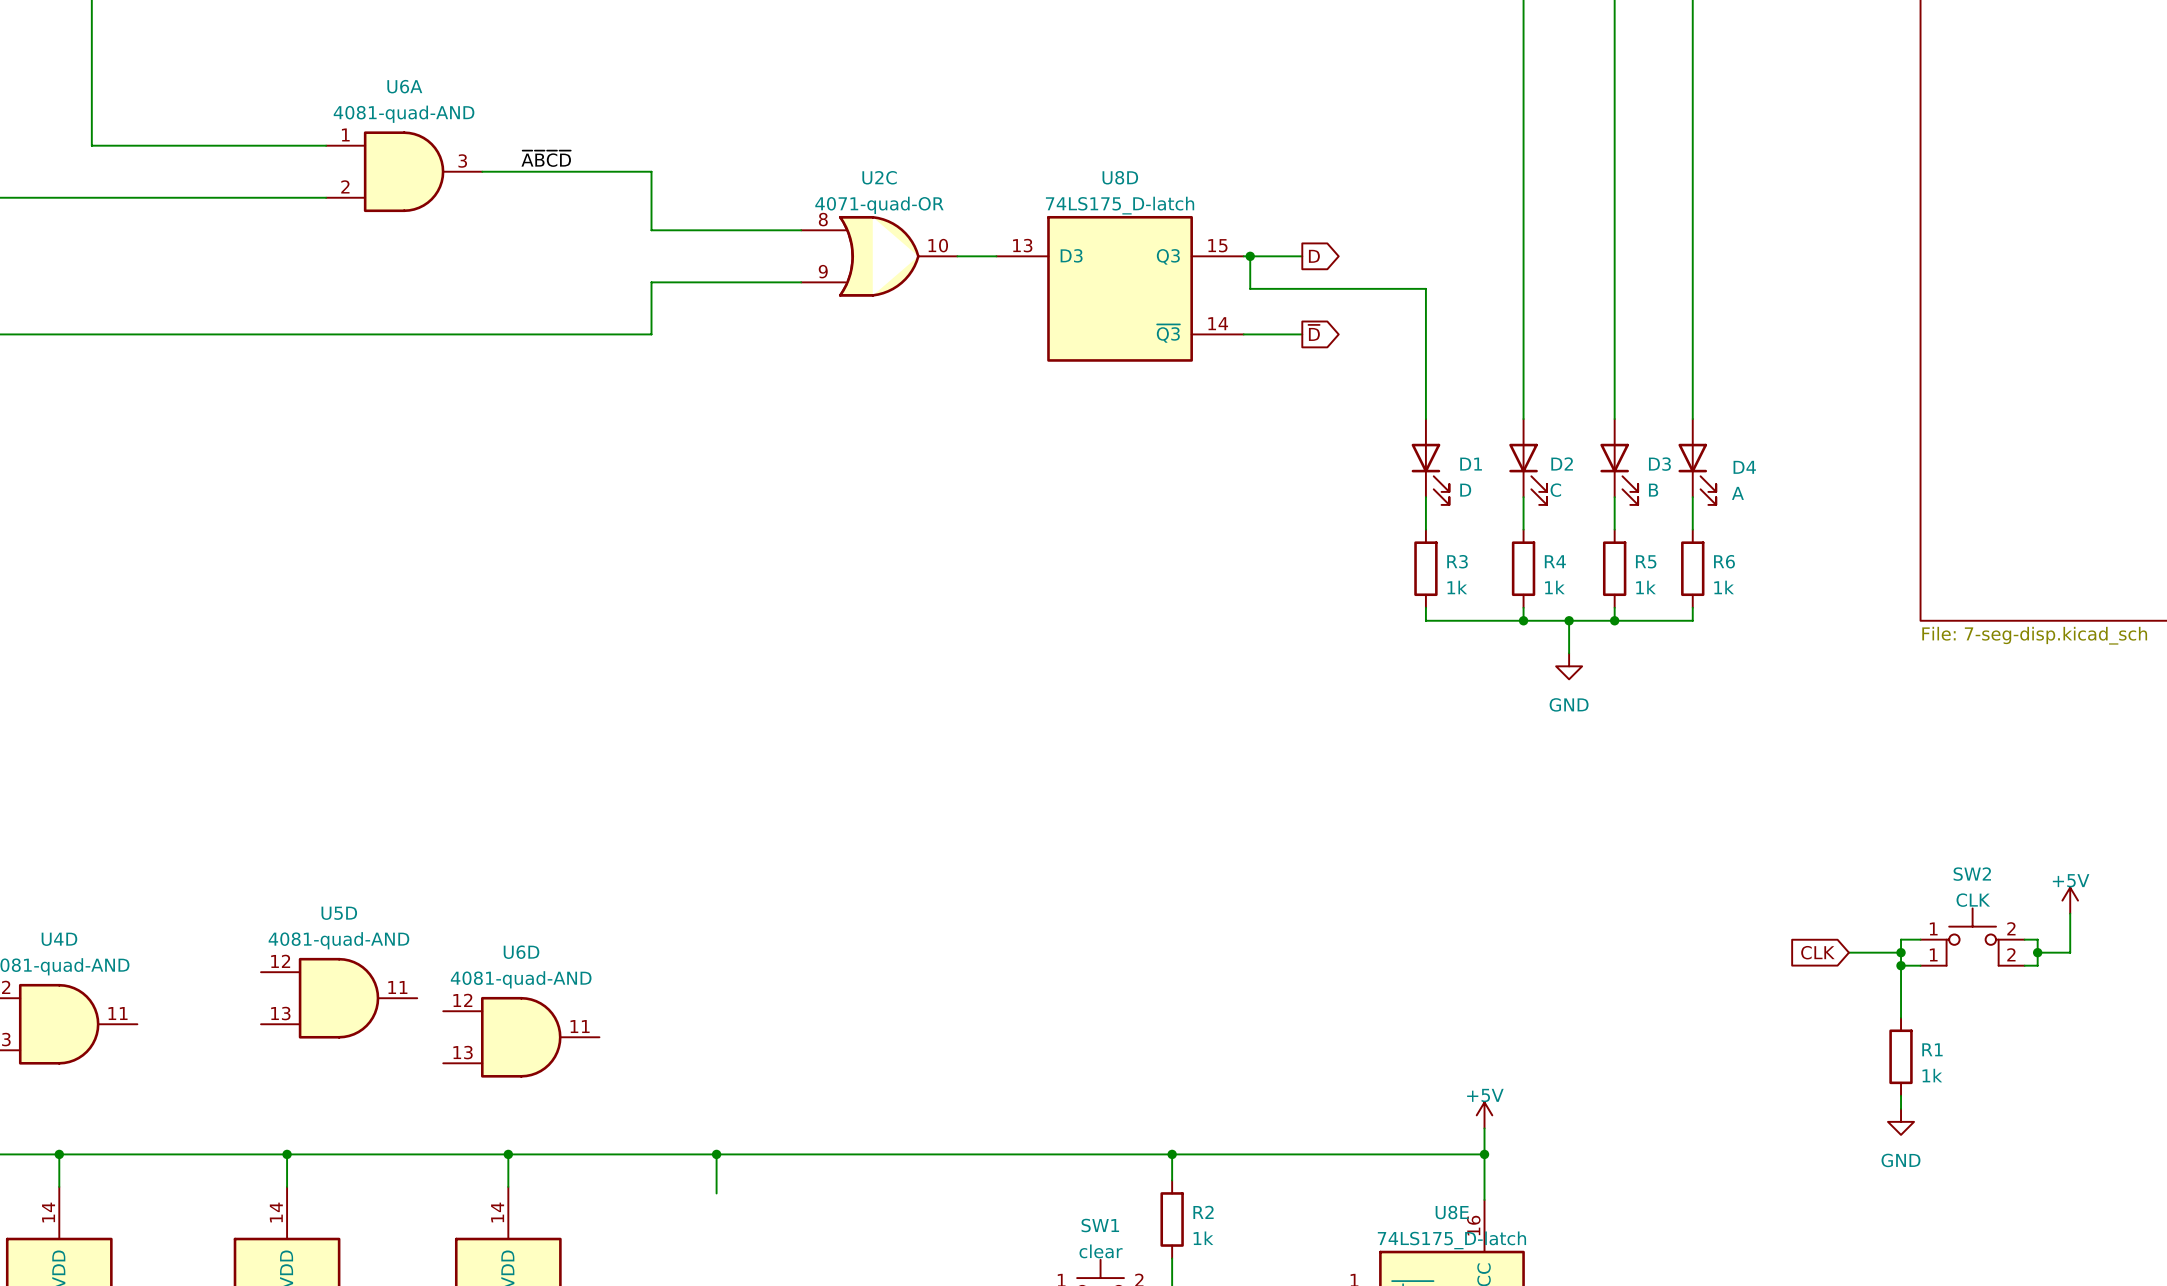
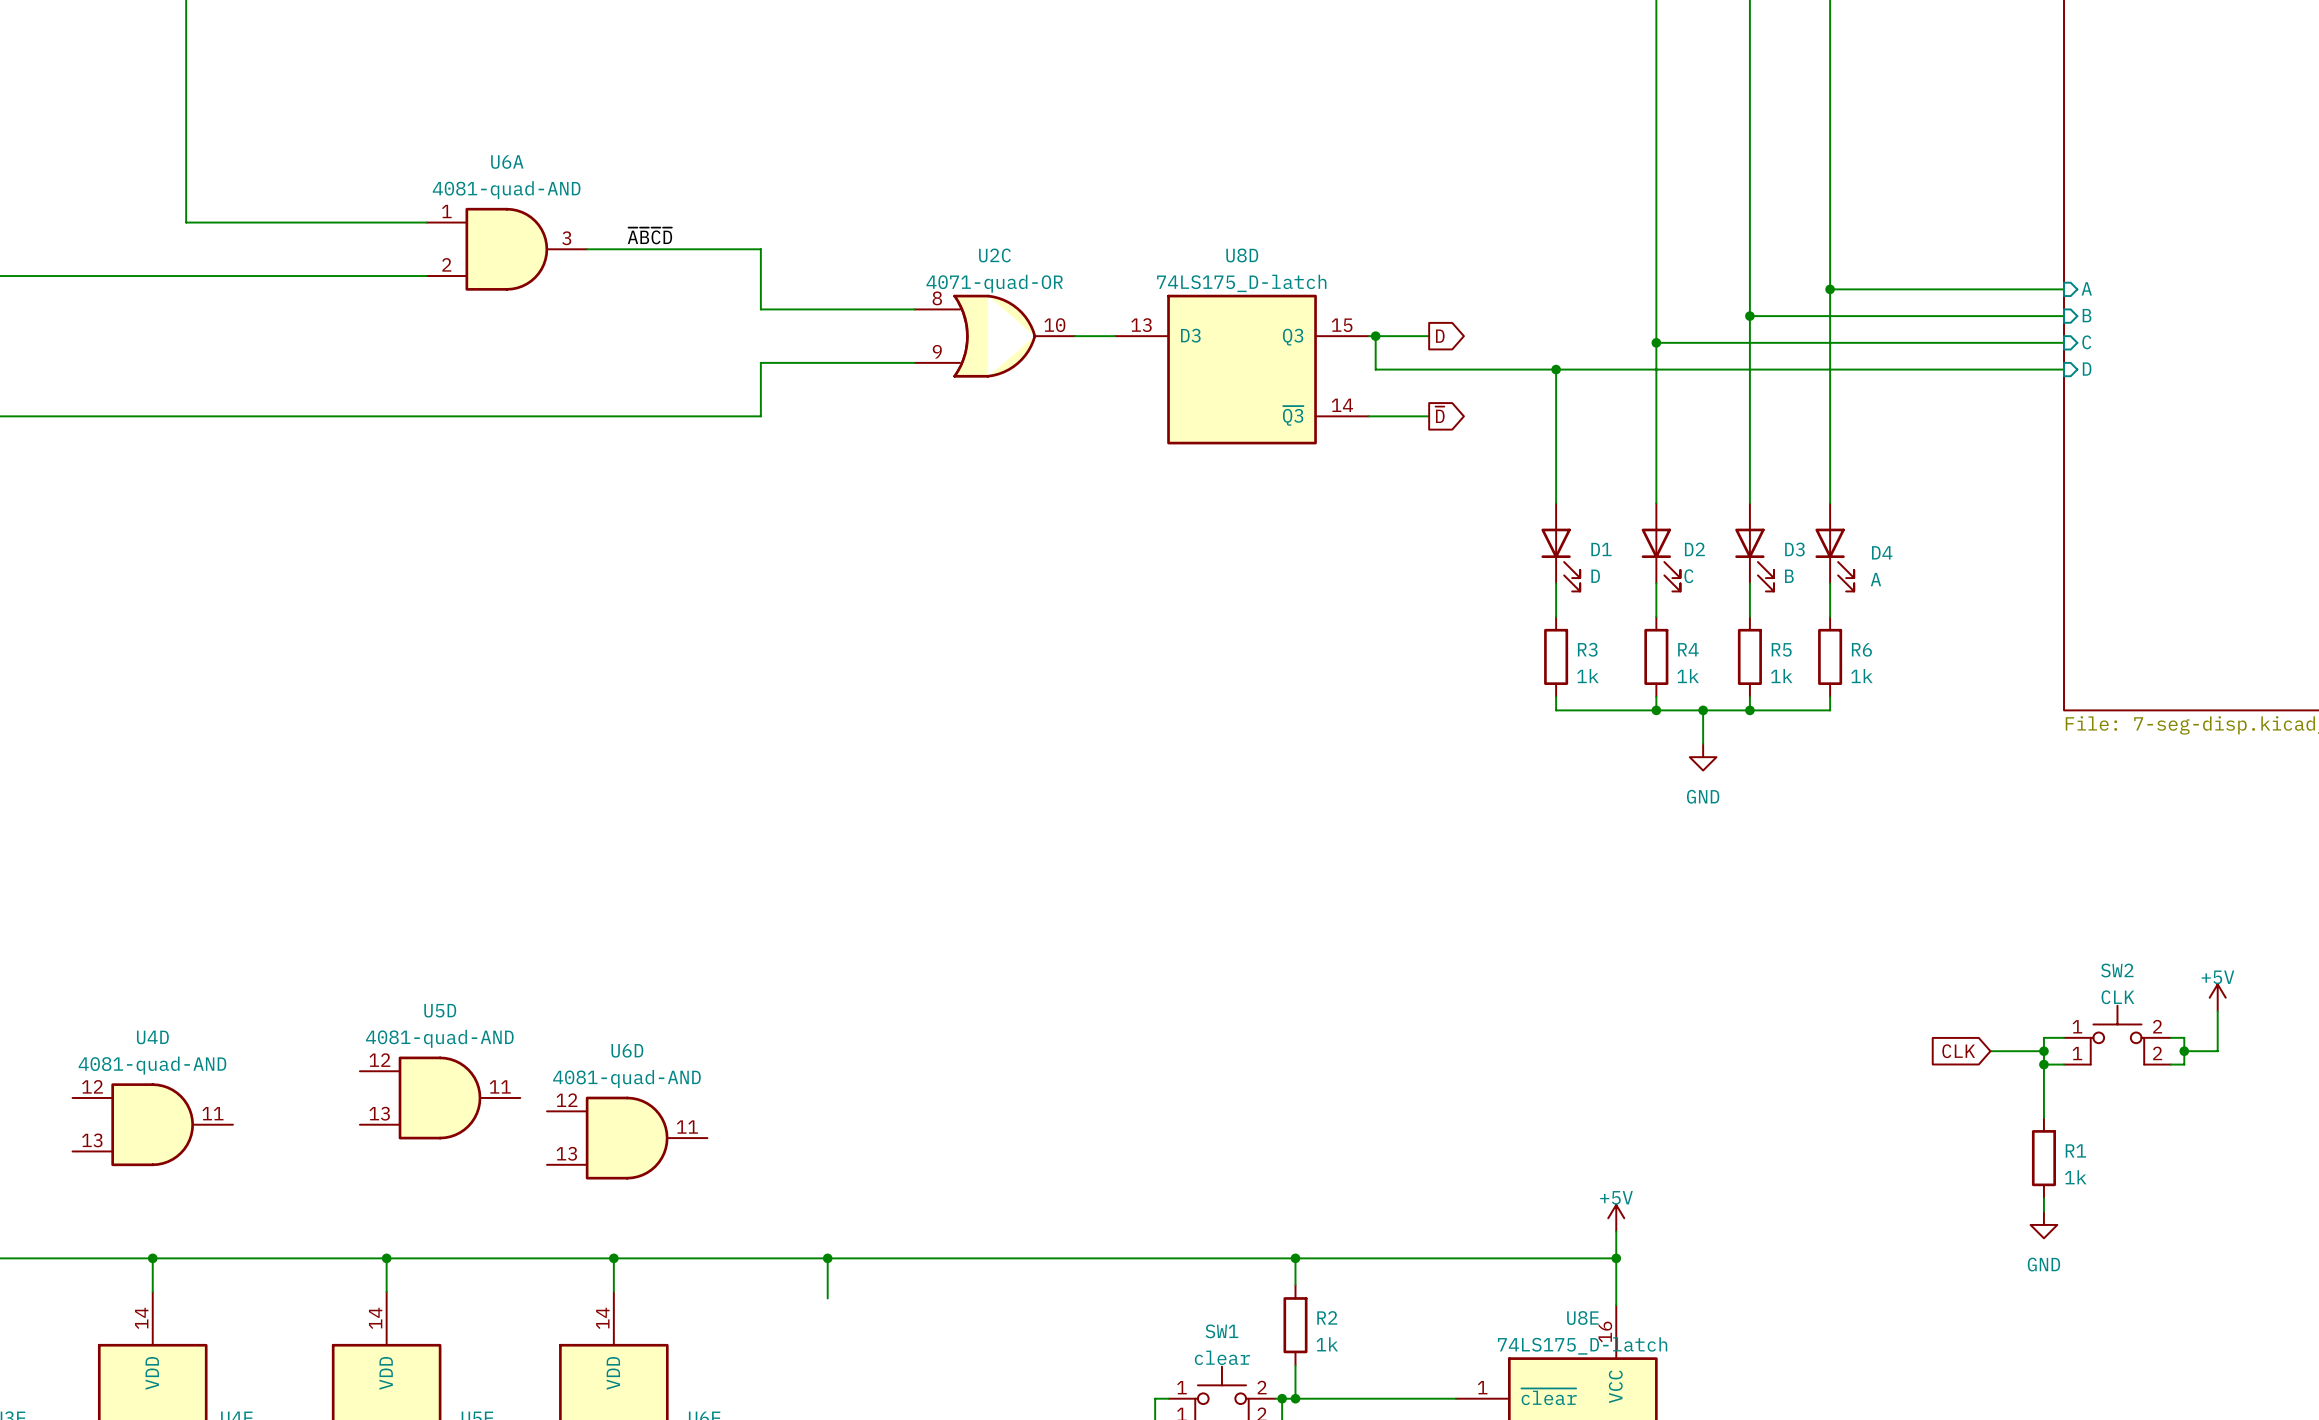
wire: none -> (1830, 289) (2064, 289)
junction: none -> (1830, 289)
sheet pin: none -> A (2086, 288)
wire: none -> (1749, 316) (2064, 316)
junction: none -> (1749, 316)
sheet pin: none -> B (2087, 315)
wire: none -> (1656, 342) (2064, 342)
junction: none -> (1656, 342)
sheet pin: none -> C (2086, 342)
wire: none -> (1556, 369) (2064, 369)
junction: none -> (1556, 369)
sheet pin: none -> D (2087, 369)

